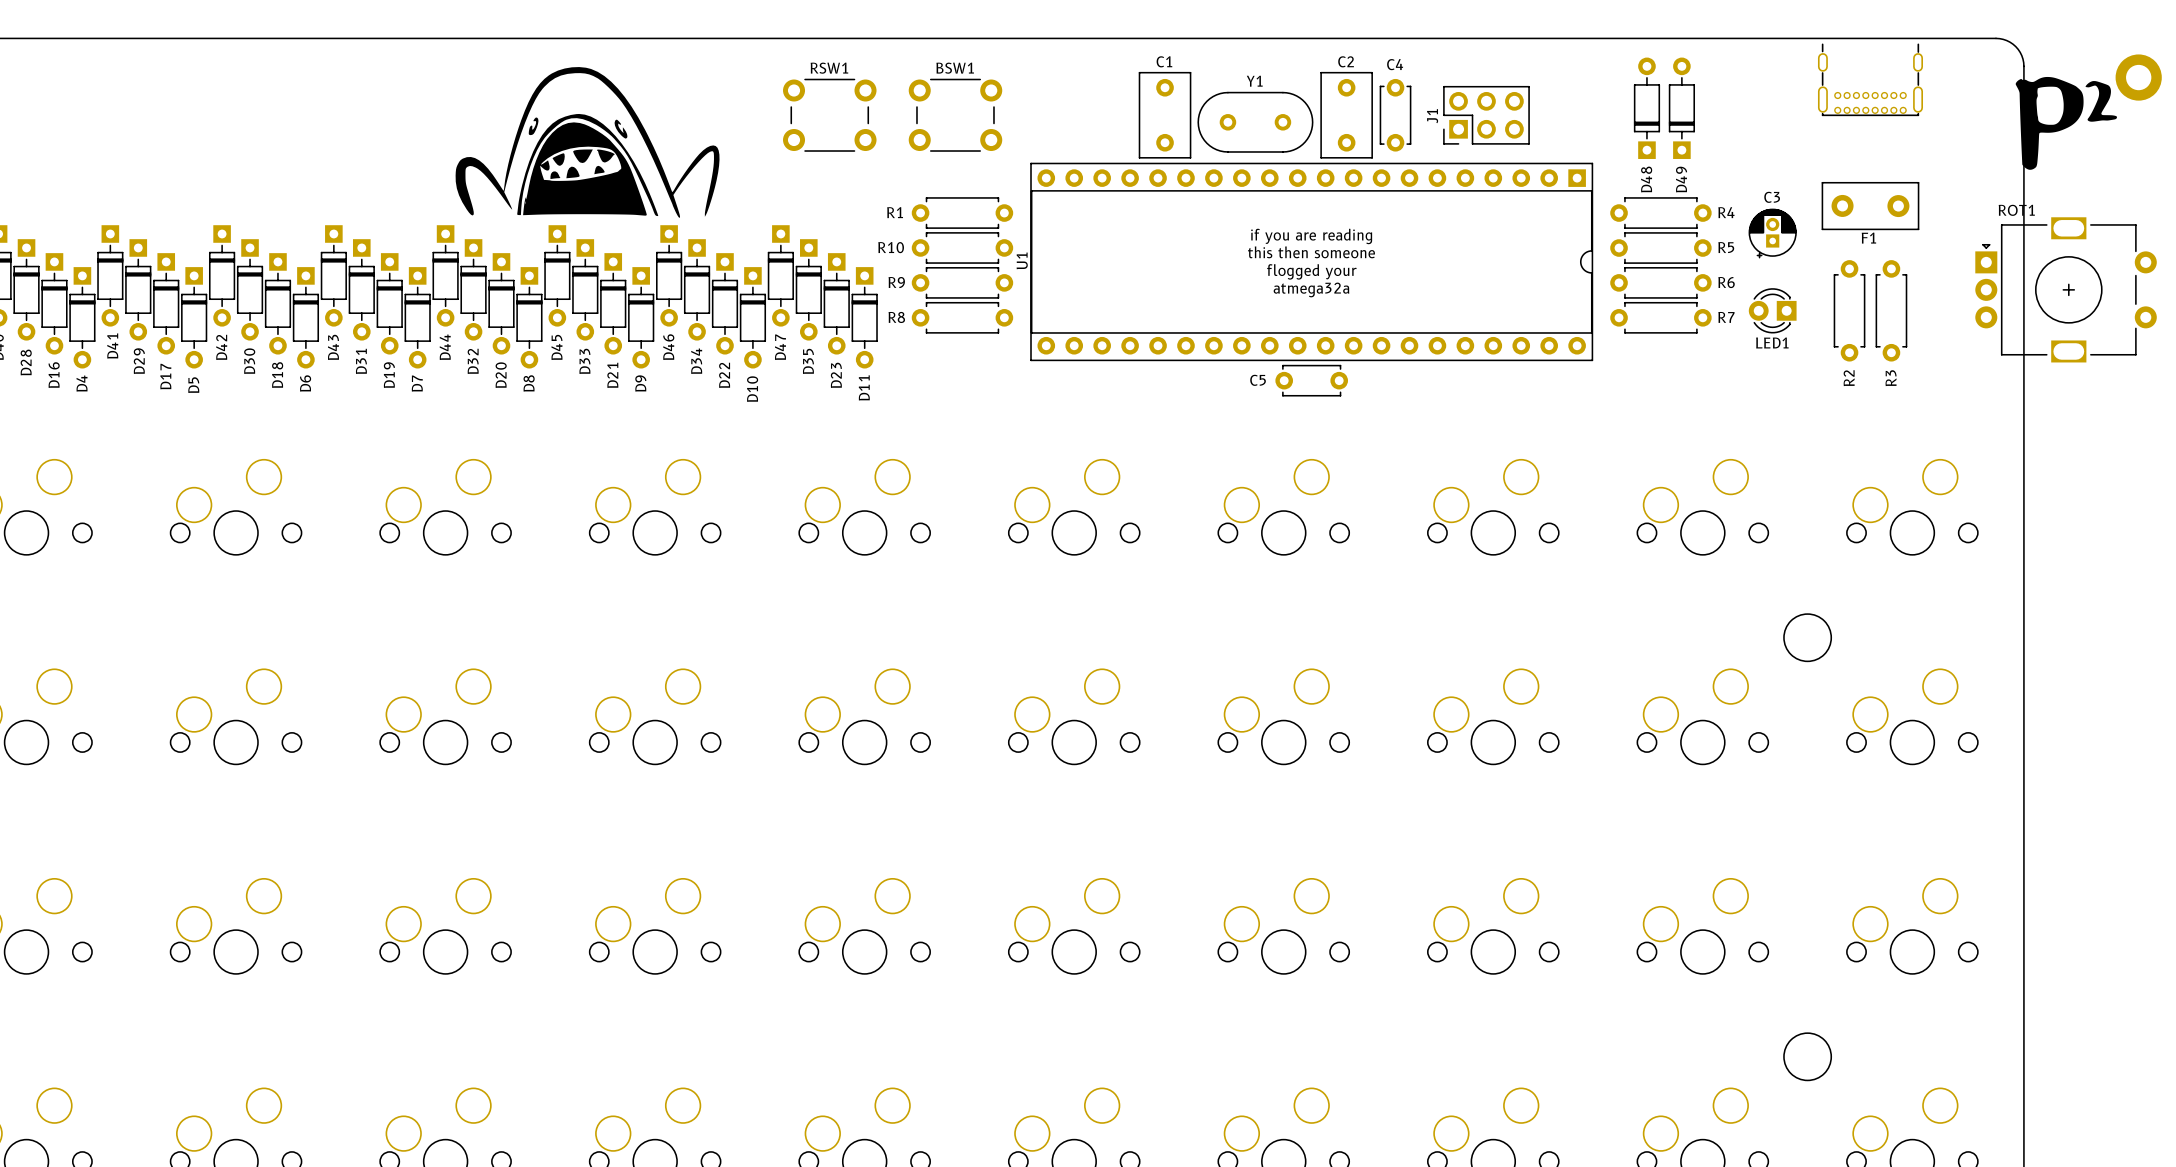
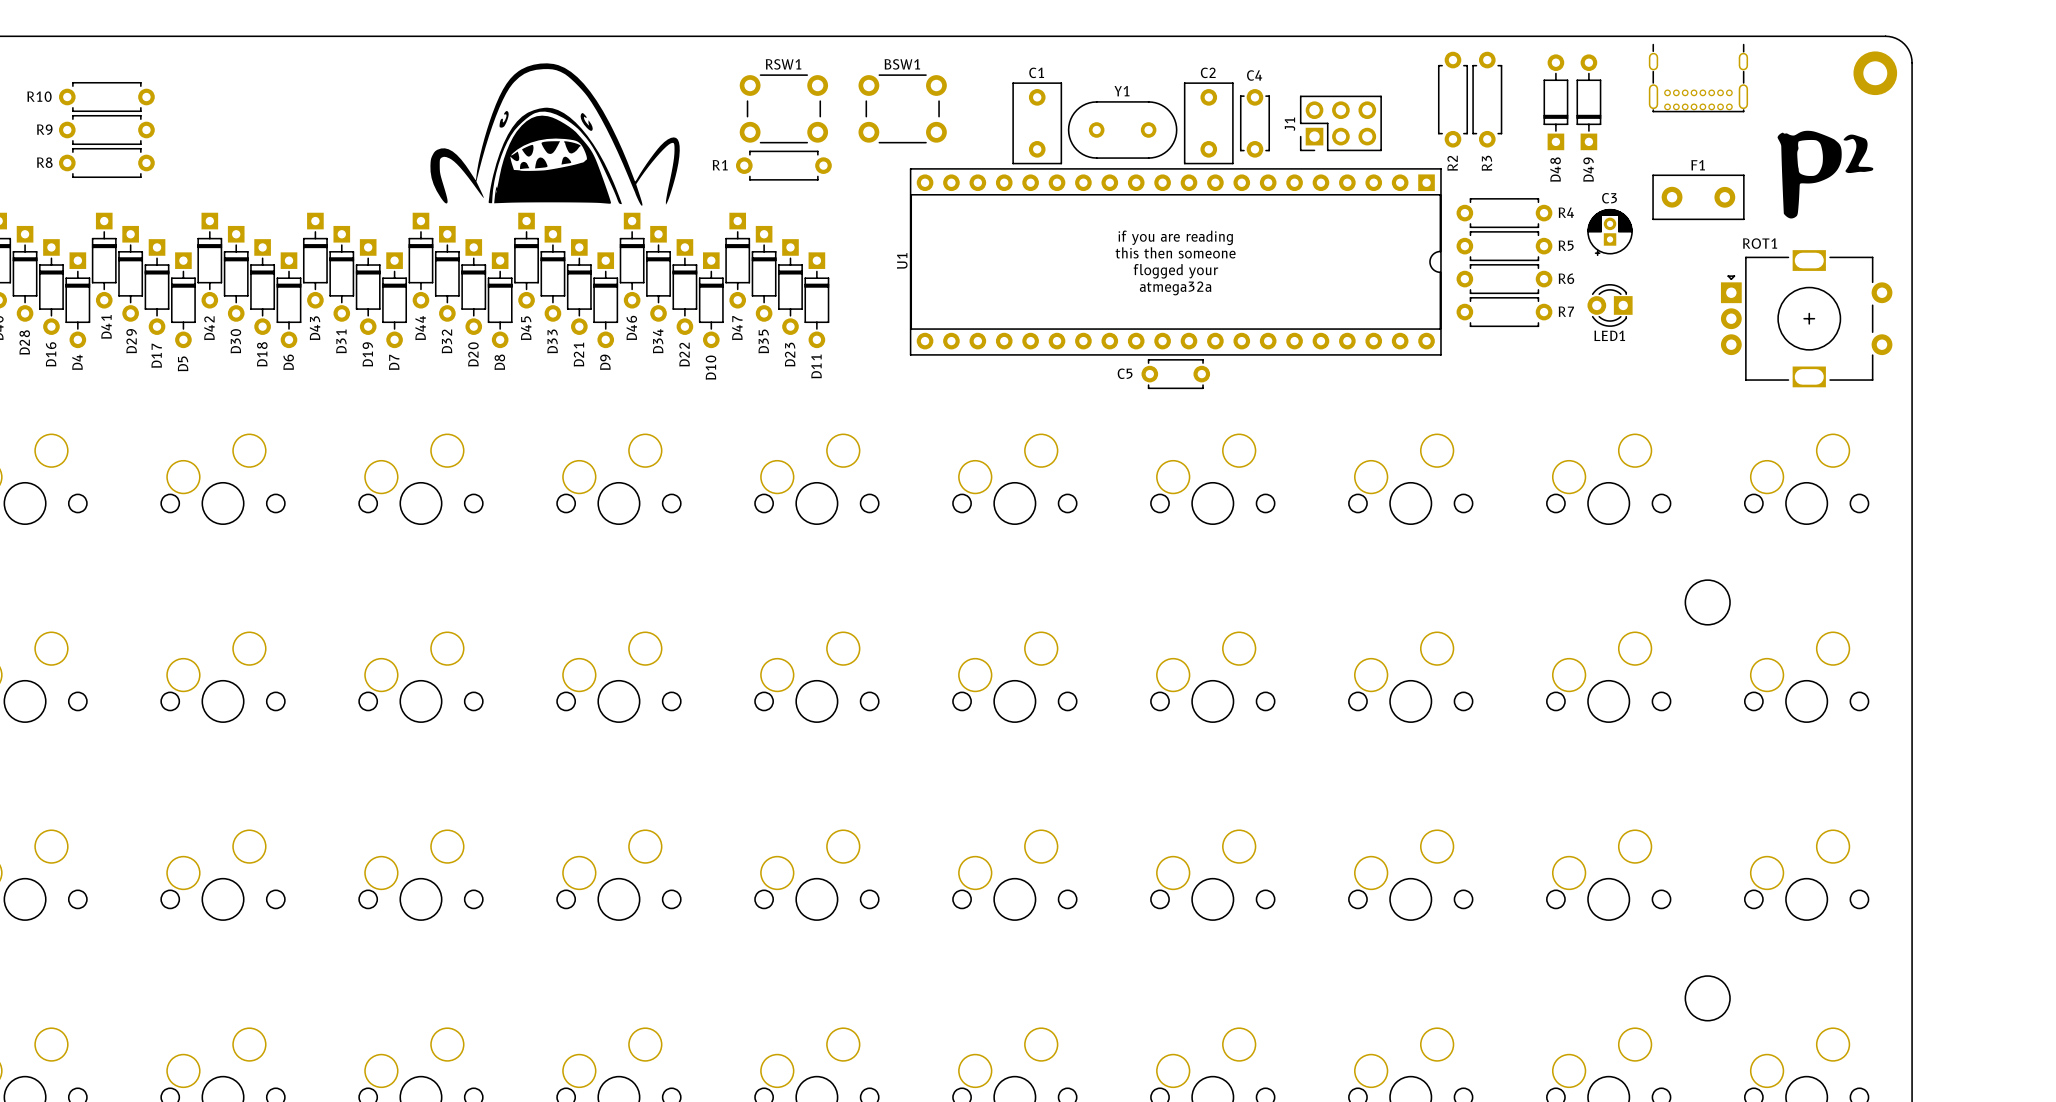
part position: (2138, 77) -> (1875, 73)
part position: (1870, 79) -> (1698, 78)
C1 position: (1165, 115) -> (1037, 123)
C2 position: (1346, 115) -> (1208, 123)
C4 position: (1395, 115) -> (1254, 123)
J1 position: (1486, 115) -> (1340, 123)
Y1 position: (1255, 122) -> (1122, 130)
drawing position: (2066, 123) -> (1825, 174)
F1 position: (1870, 206) -> (1698, 197)
R1 position: (962, 213) -> (783, 165)
R4 position: (1660, 213) -> (1504, 213)
C3 position: (1772, 233) -> (1610, 232)
text position: if you are reading (1311, 236) -> if you are reading (1175, 237)
F1 name position: F1 (1868, 238) -> F1 (1698, 165)
R10 position: (962, 247) -> (106, 97)
R5 position: (1660, 248) -> (1504, 246)
text position: this then someone (1311, 252) -> this then someone (1175, 252)
U1 position: (1311, 261) -> (1175, 261)
text position: flogged your (1311, 271) -> flogged your (1175, 271)
R9 position: (962, 282) -> (106, 130)
R6 position: (1660, 282) -> (1504, 279)
text position: atmega32a (1311, 289) -> atmega32a (1175, 288)
ROT1 position: (2066, 289) -> (1806, 318)
LED1 position: (1772, 310) -> (1610, 305)
R2 position: (1849, 310) -> (1452, 99)
R3 position: (1891, 310) -> (1487, 99)
R8 position: (962, 317) -> (106, 162)
R7 position: (1660, 317) -> (1504, 312)
C5 position: (1311, 380) -> (1175, 374)

